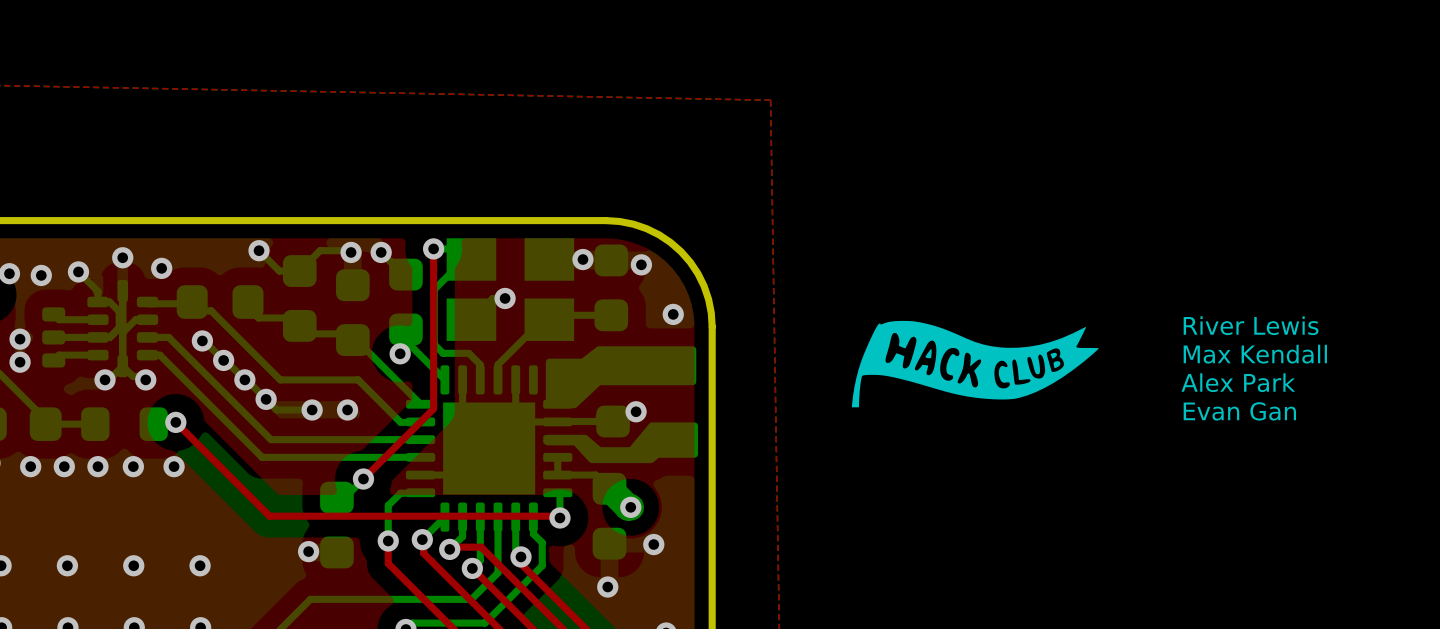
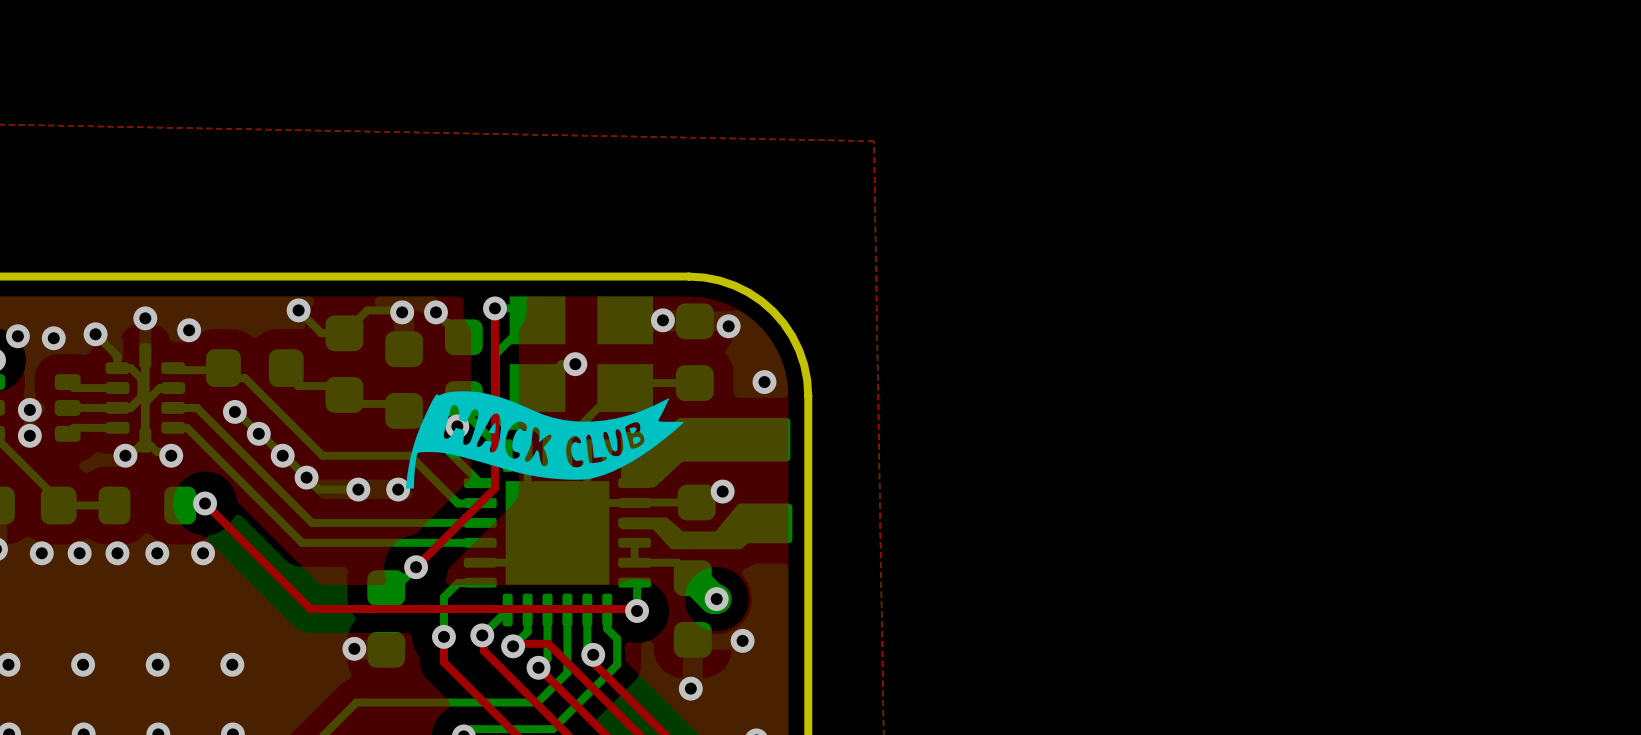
text: River Lewis (1251, 325) -> none
text: Max Kendall (1255, 354) -> none
drawing position: (975, 364) -> (544, 439)
text: Alex Park (1238, 382) -> none
text: Evan Gan (1239, 411) -> none

